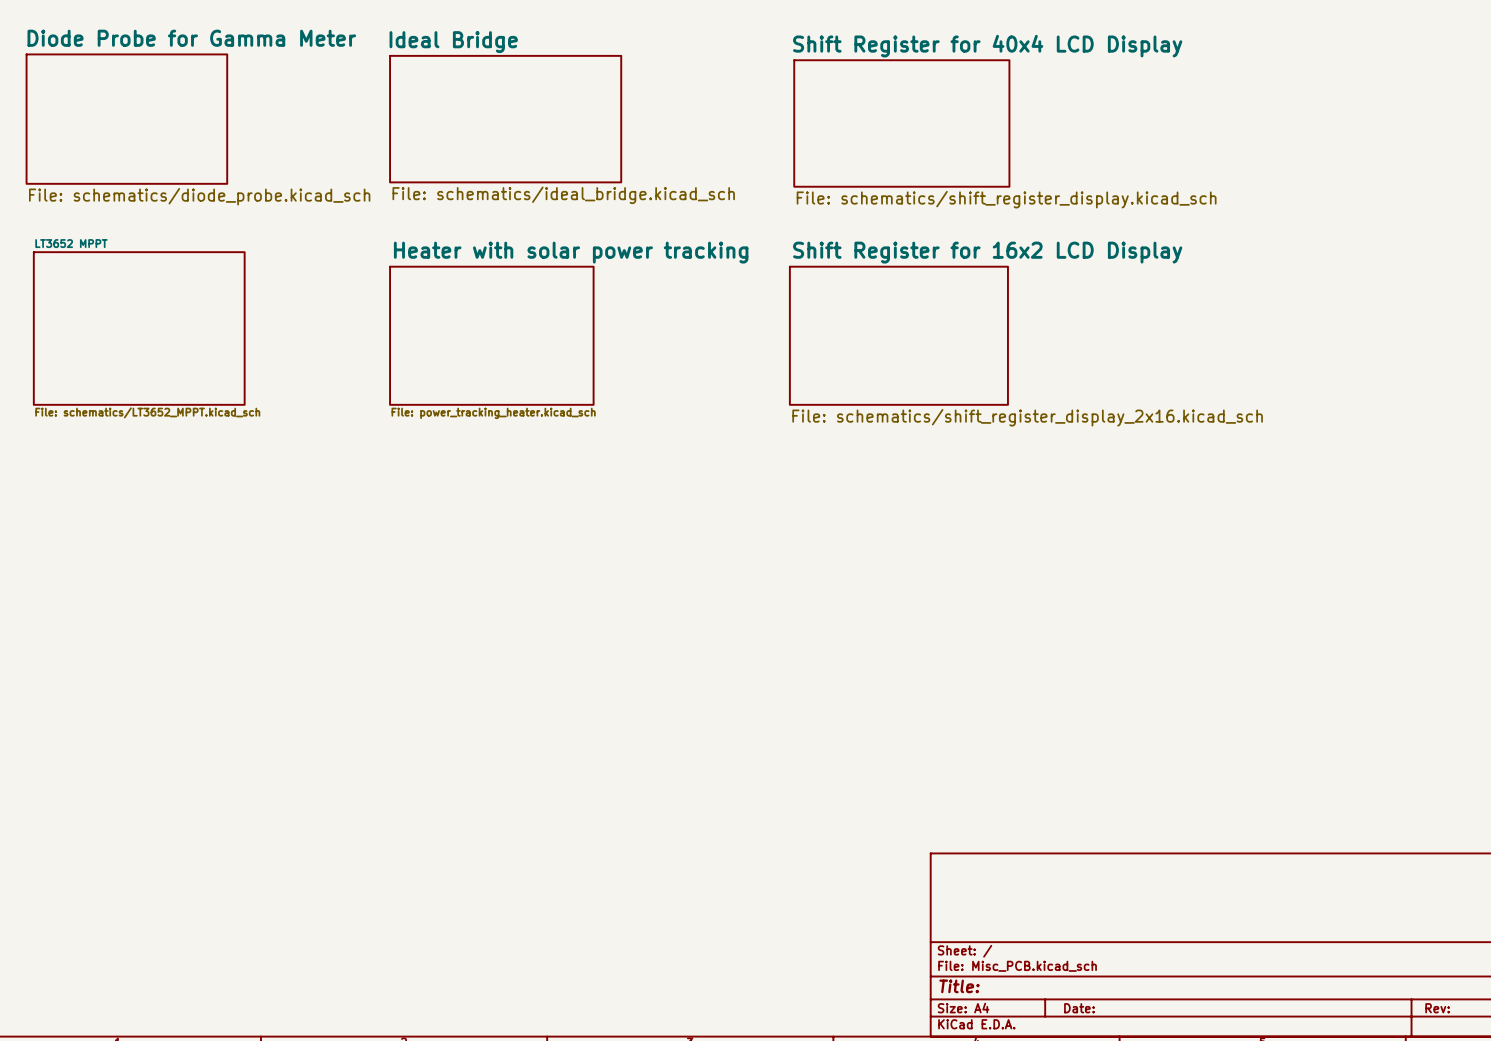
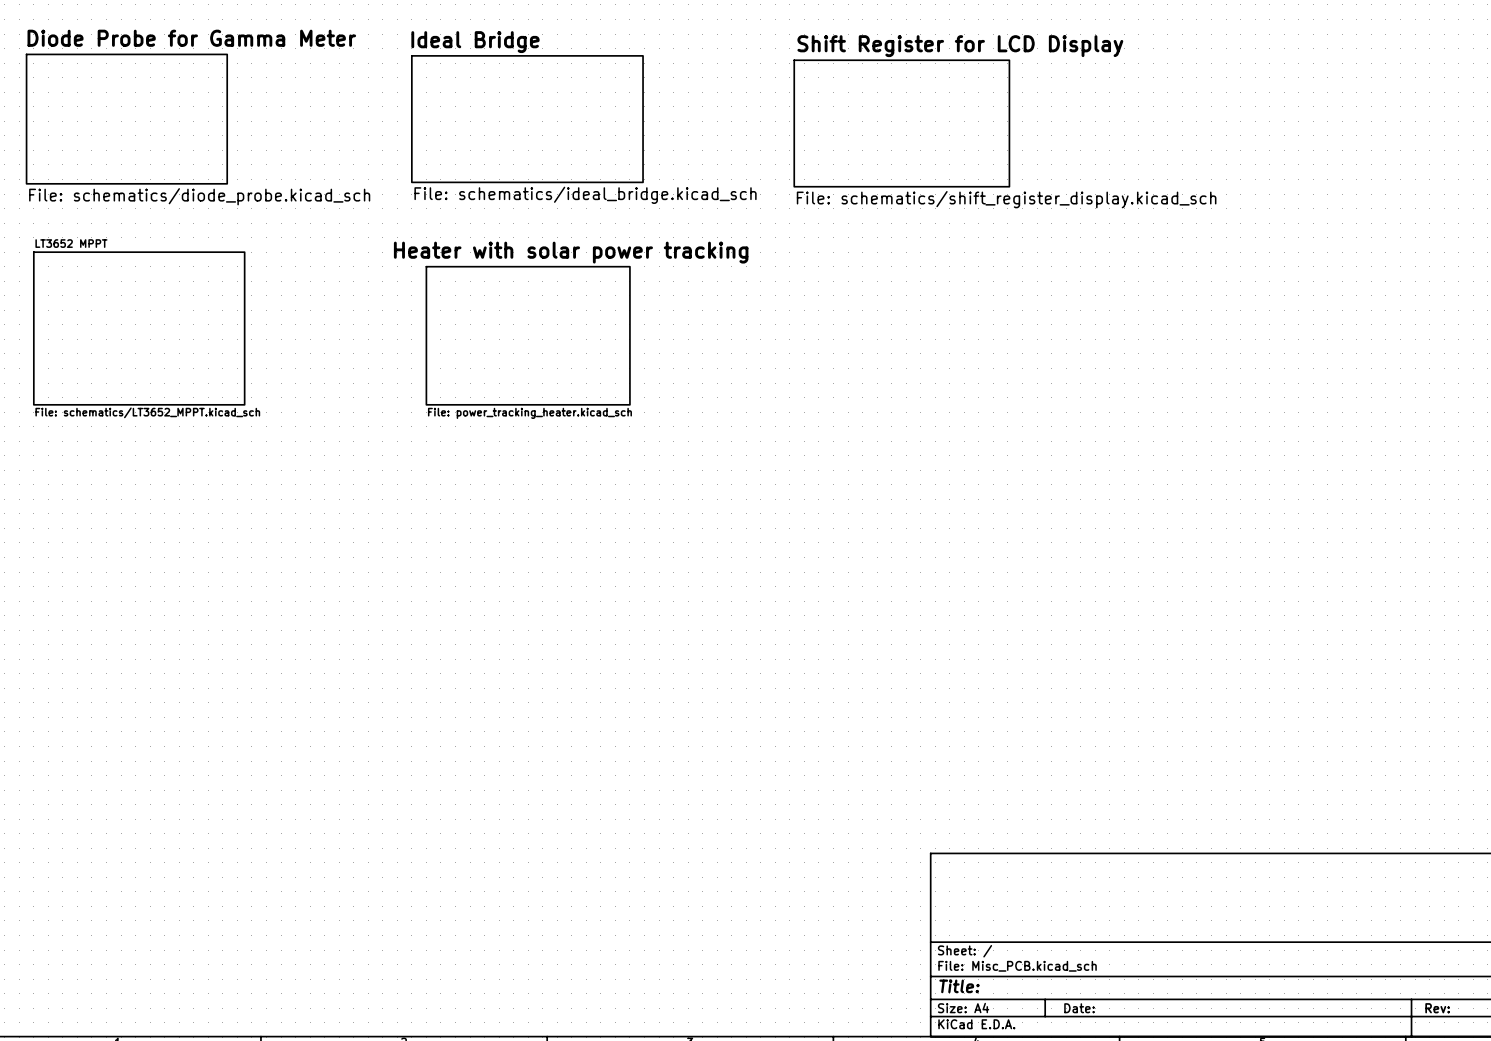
sheet Shift Register for 40x4 LCD Display name: Shift Register for 40x4 LCD Display (987, 46) -> Shift Register for LCD Display (960, 46)
sheet Ideal Bridge position: (505, 119) -> (527, 119)
sheet Heater with solar power tracking position: (491, 335) -> (528, 335)
sheet Shift Register for 16x2 LCD Display: File: schematics/shift_register_display_2x16.kicad_sch (898, 335) -> none

